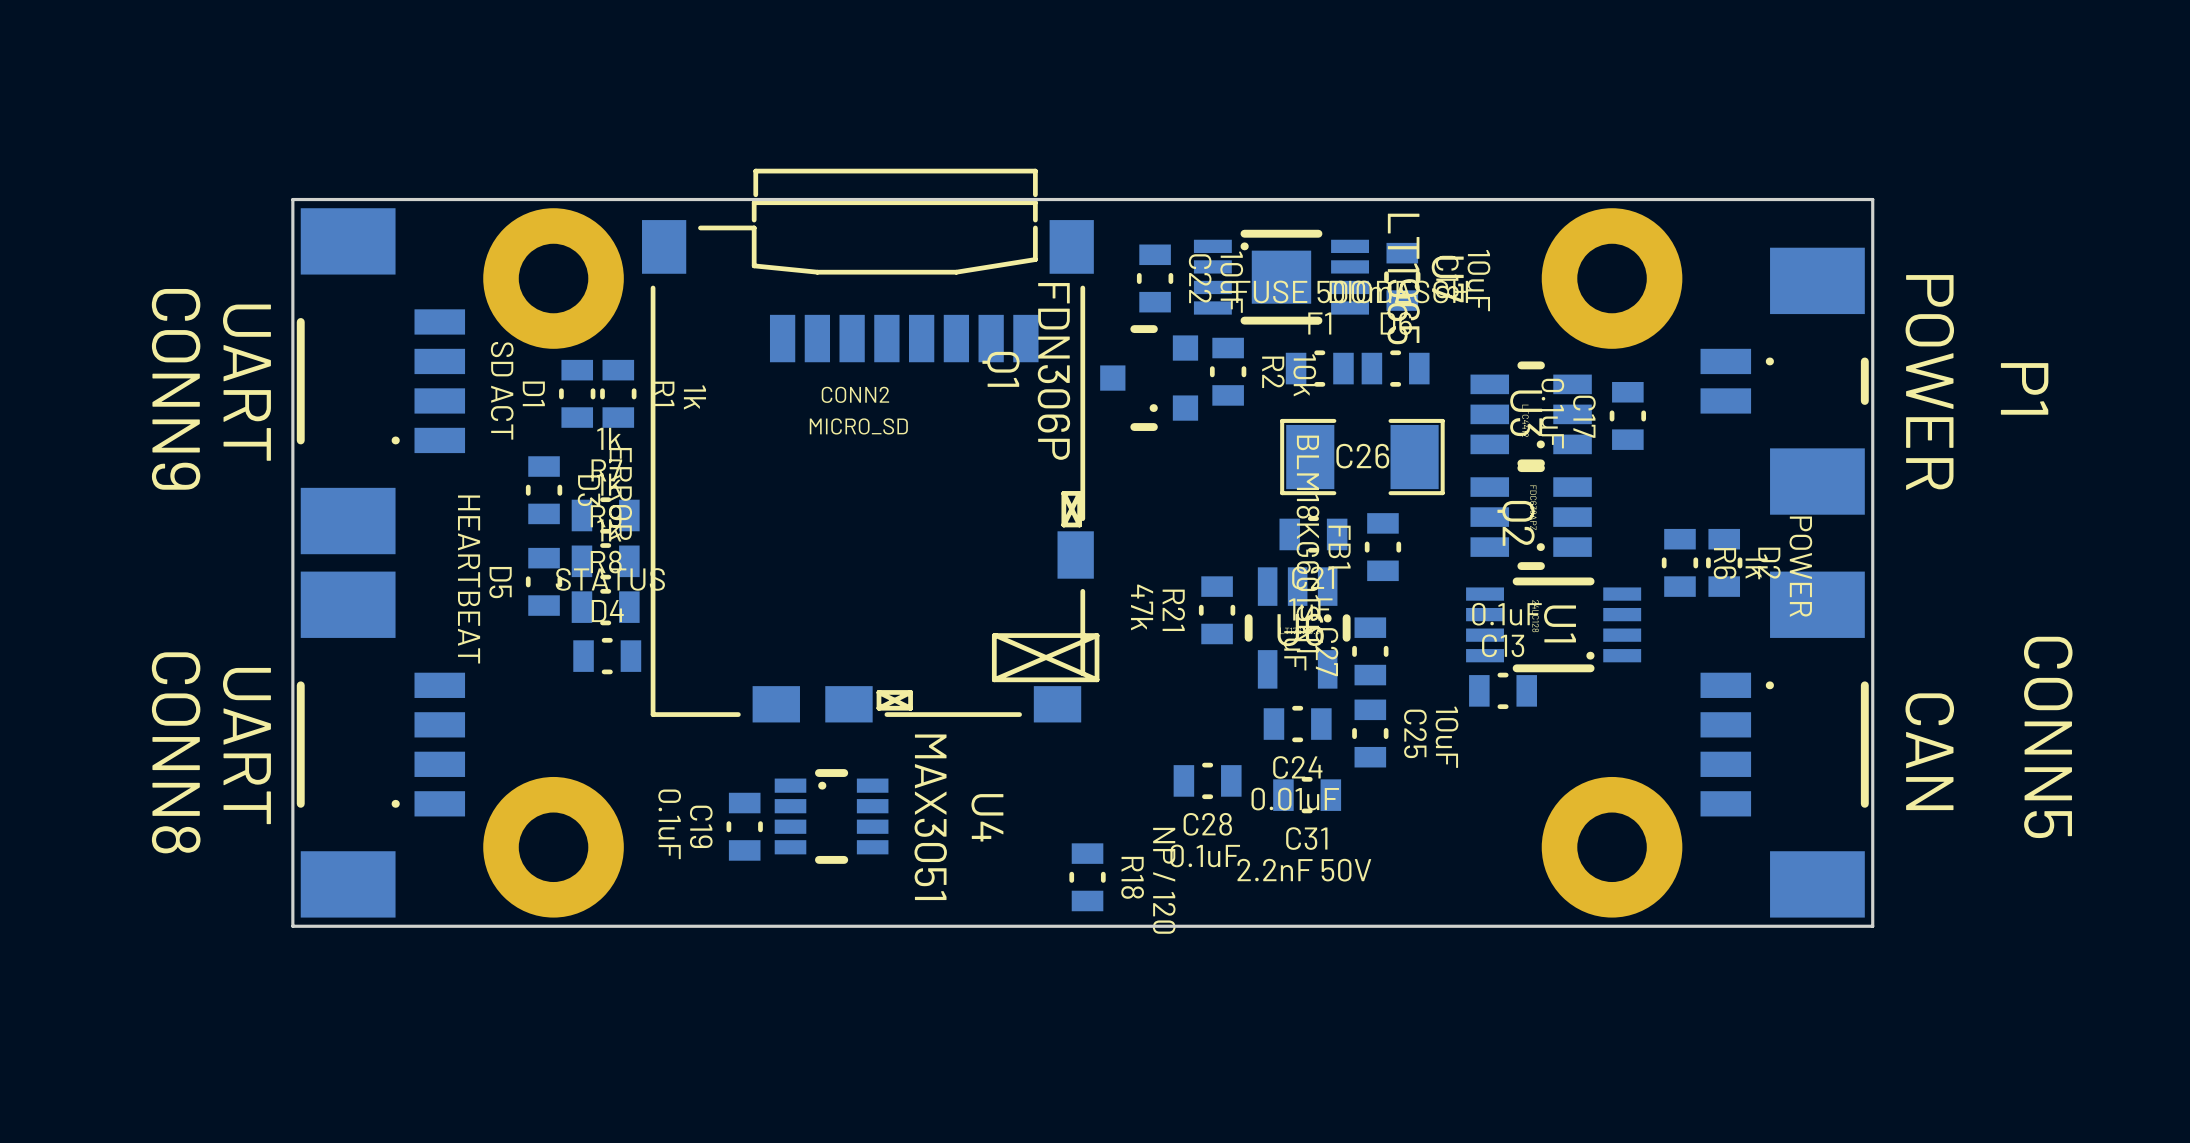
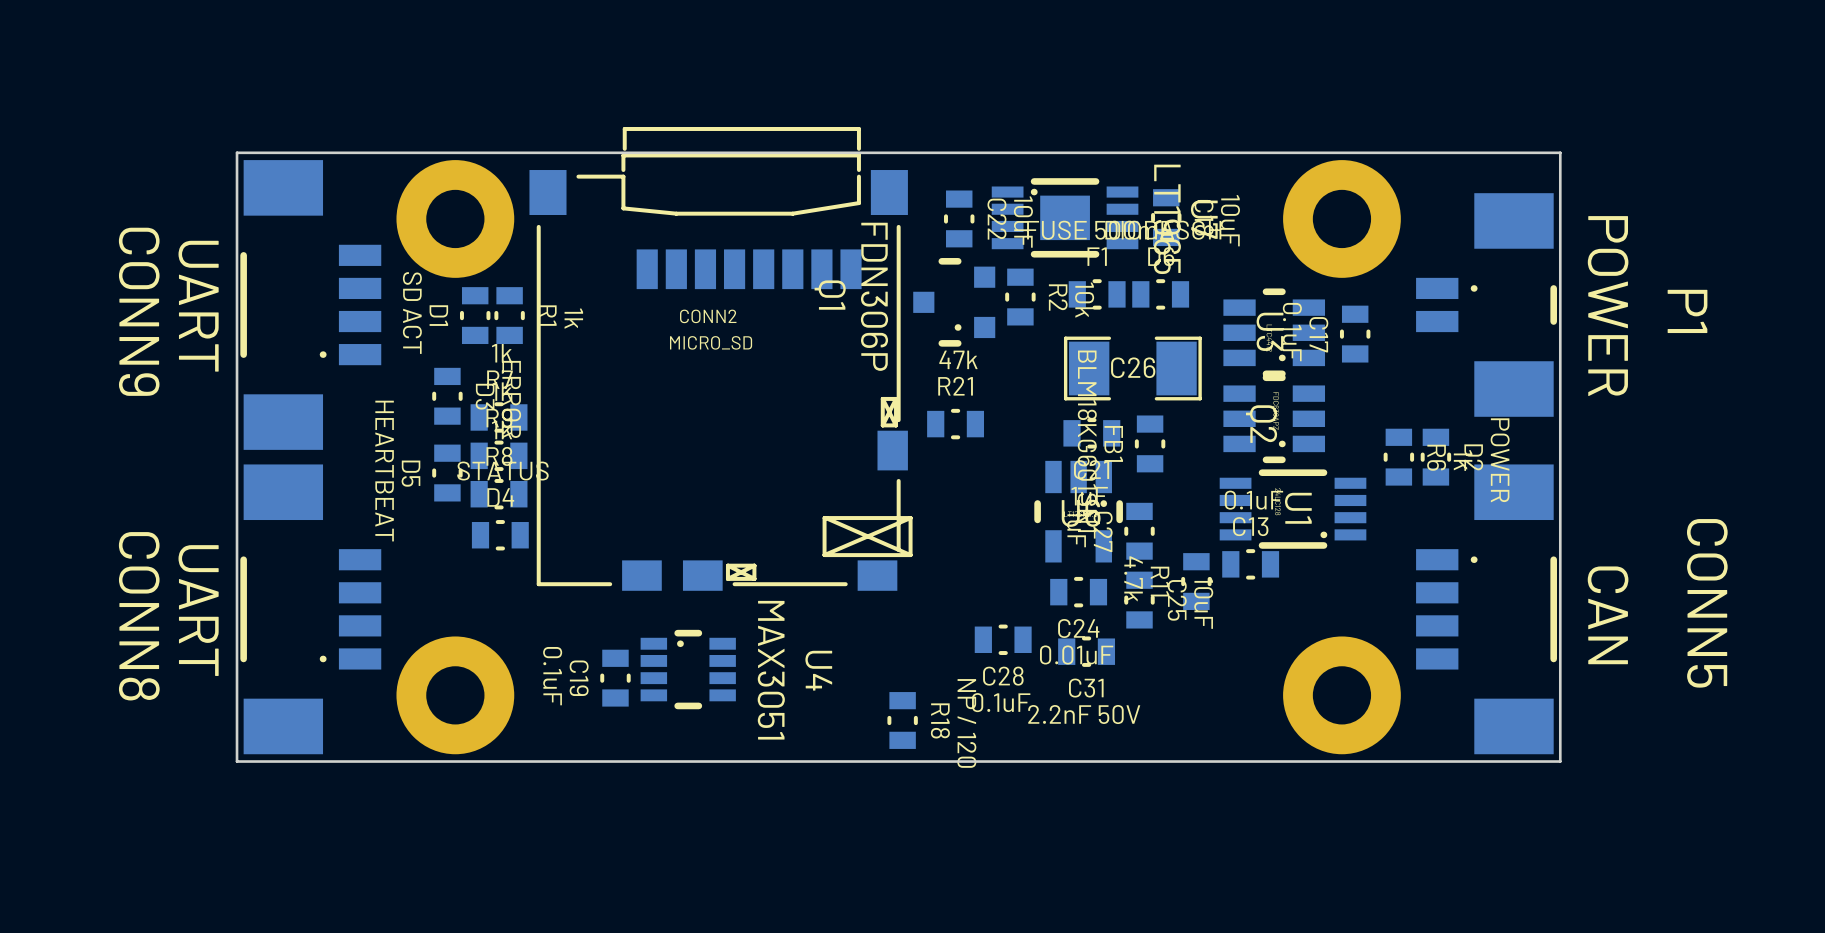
R21 rotation: 0° (1217, 610) -> 90° clockwise (955, 424)
R21 position: (1217, 610) -> (955, 424)
R11: none -> 4.7k (1196, 581)

